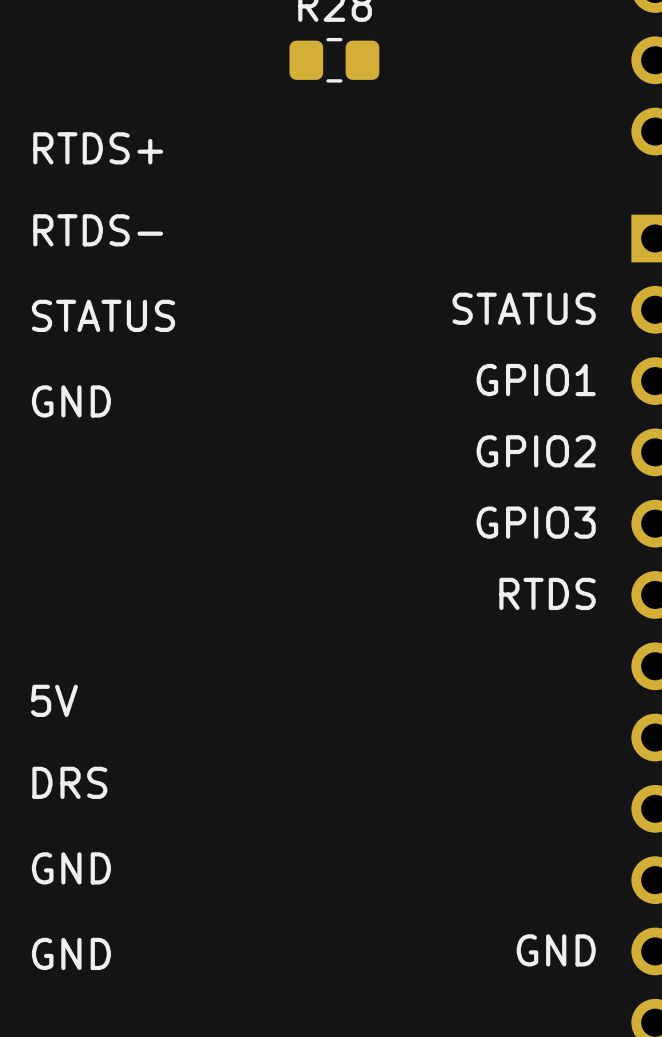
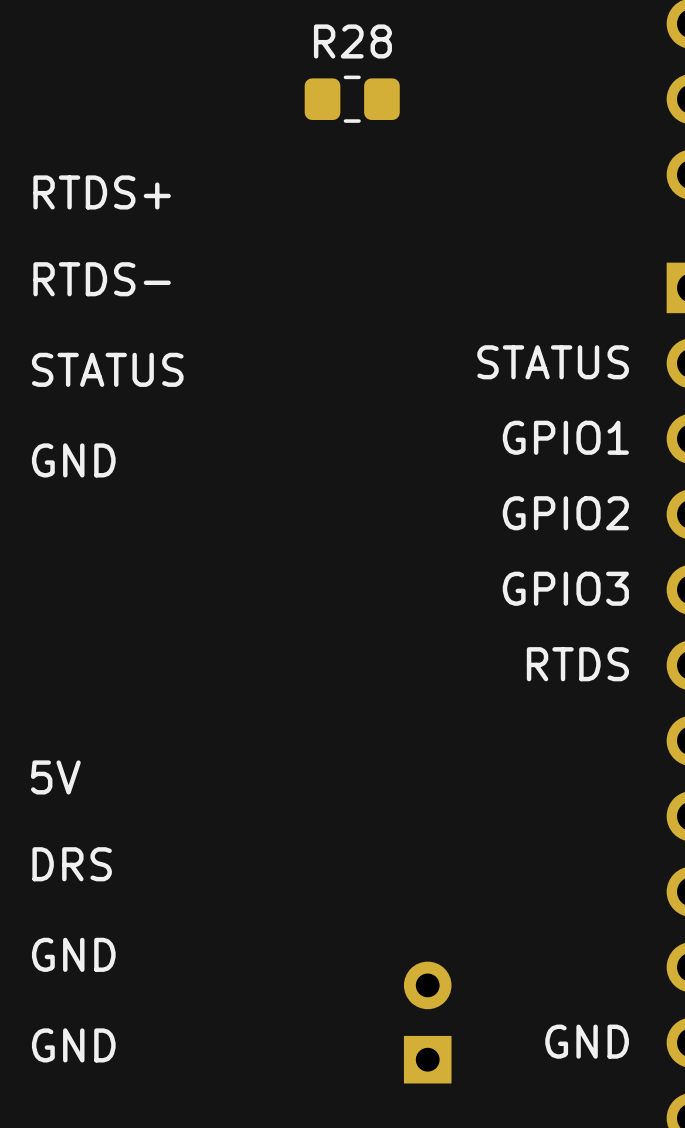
part: none -> (427, 1022)

